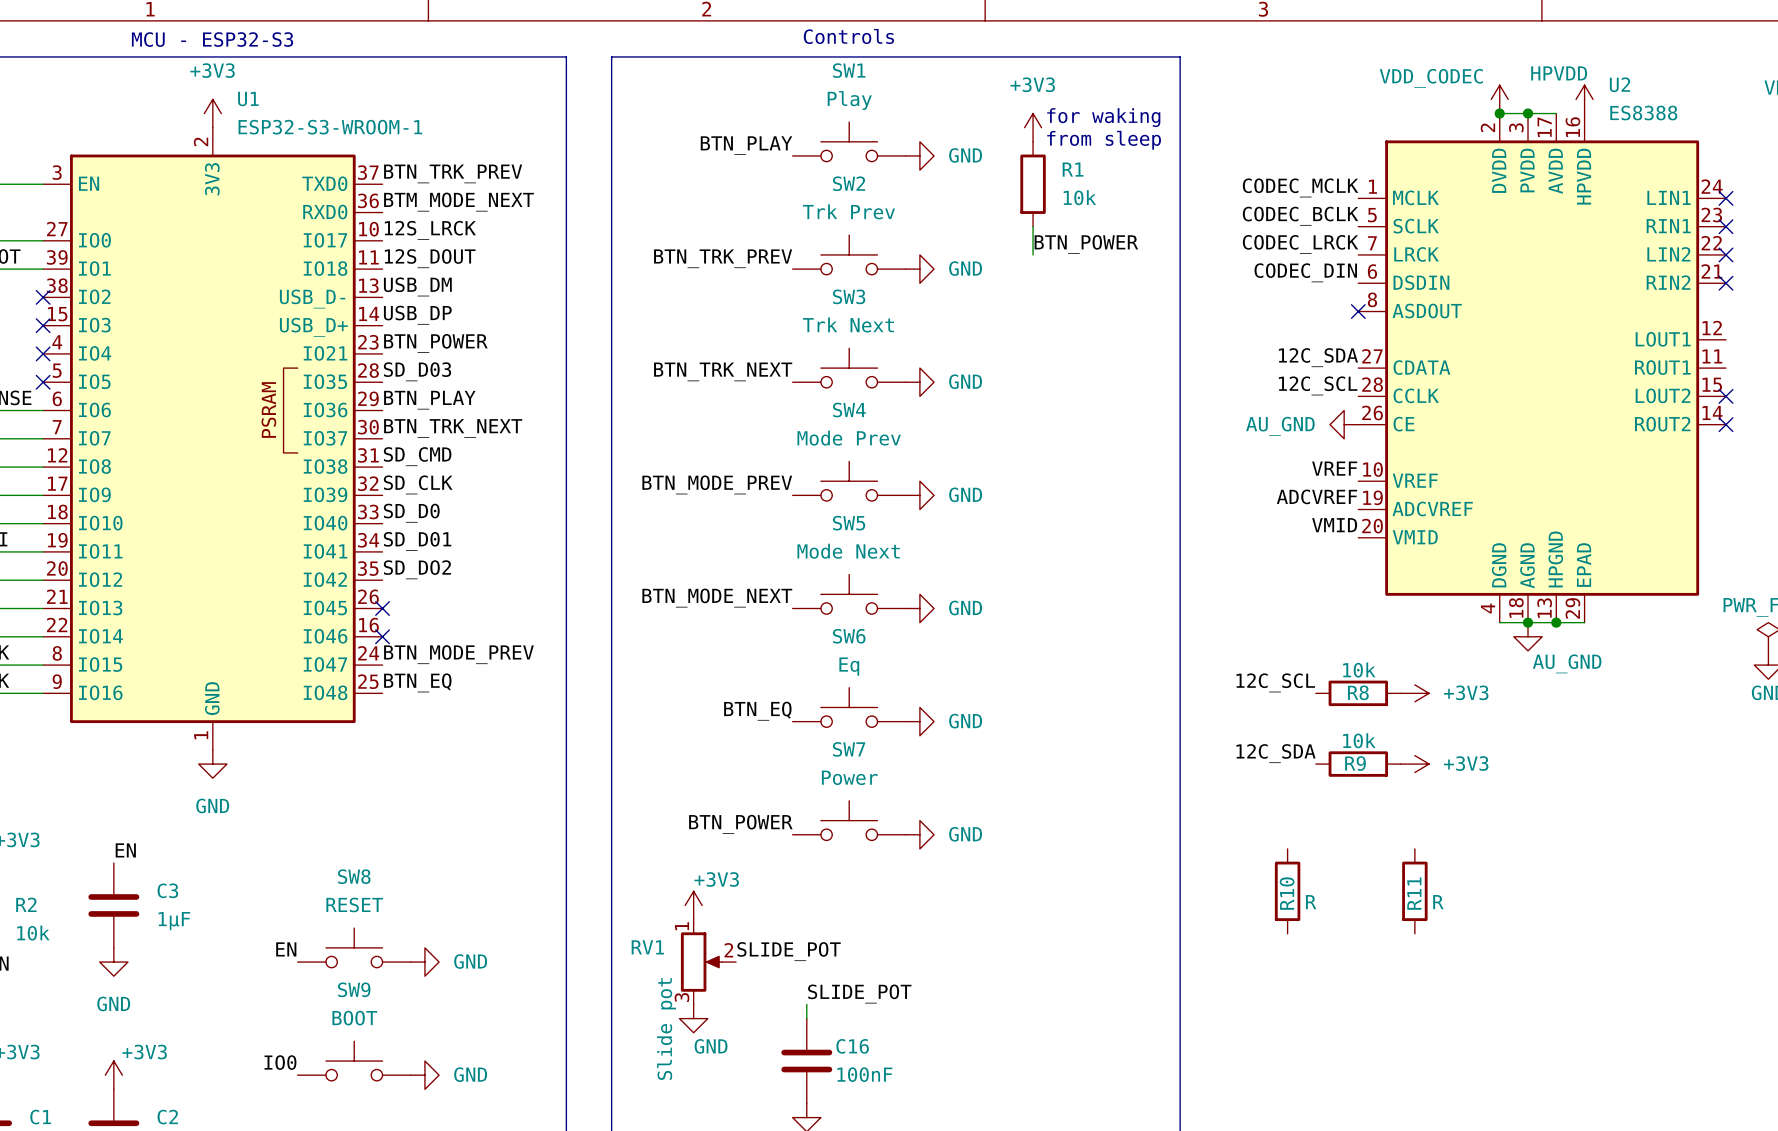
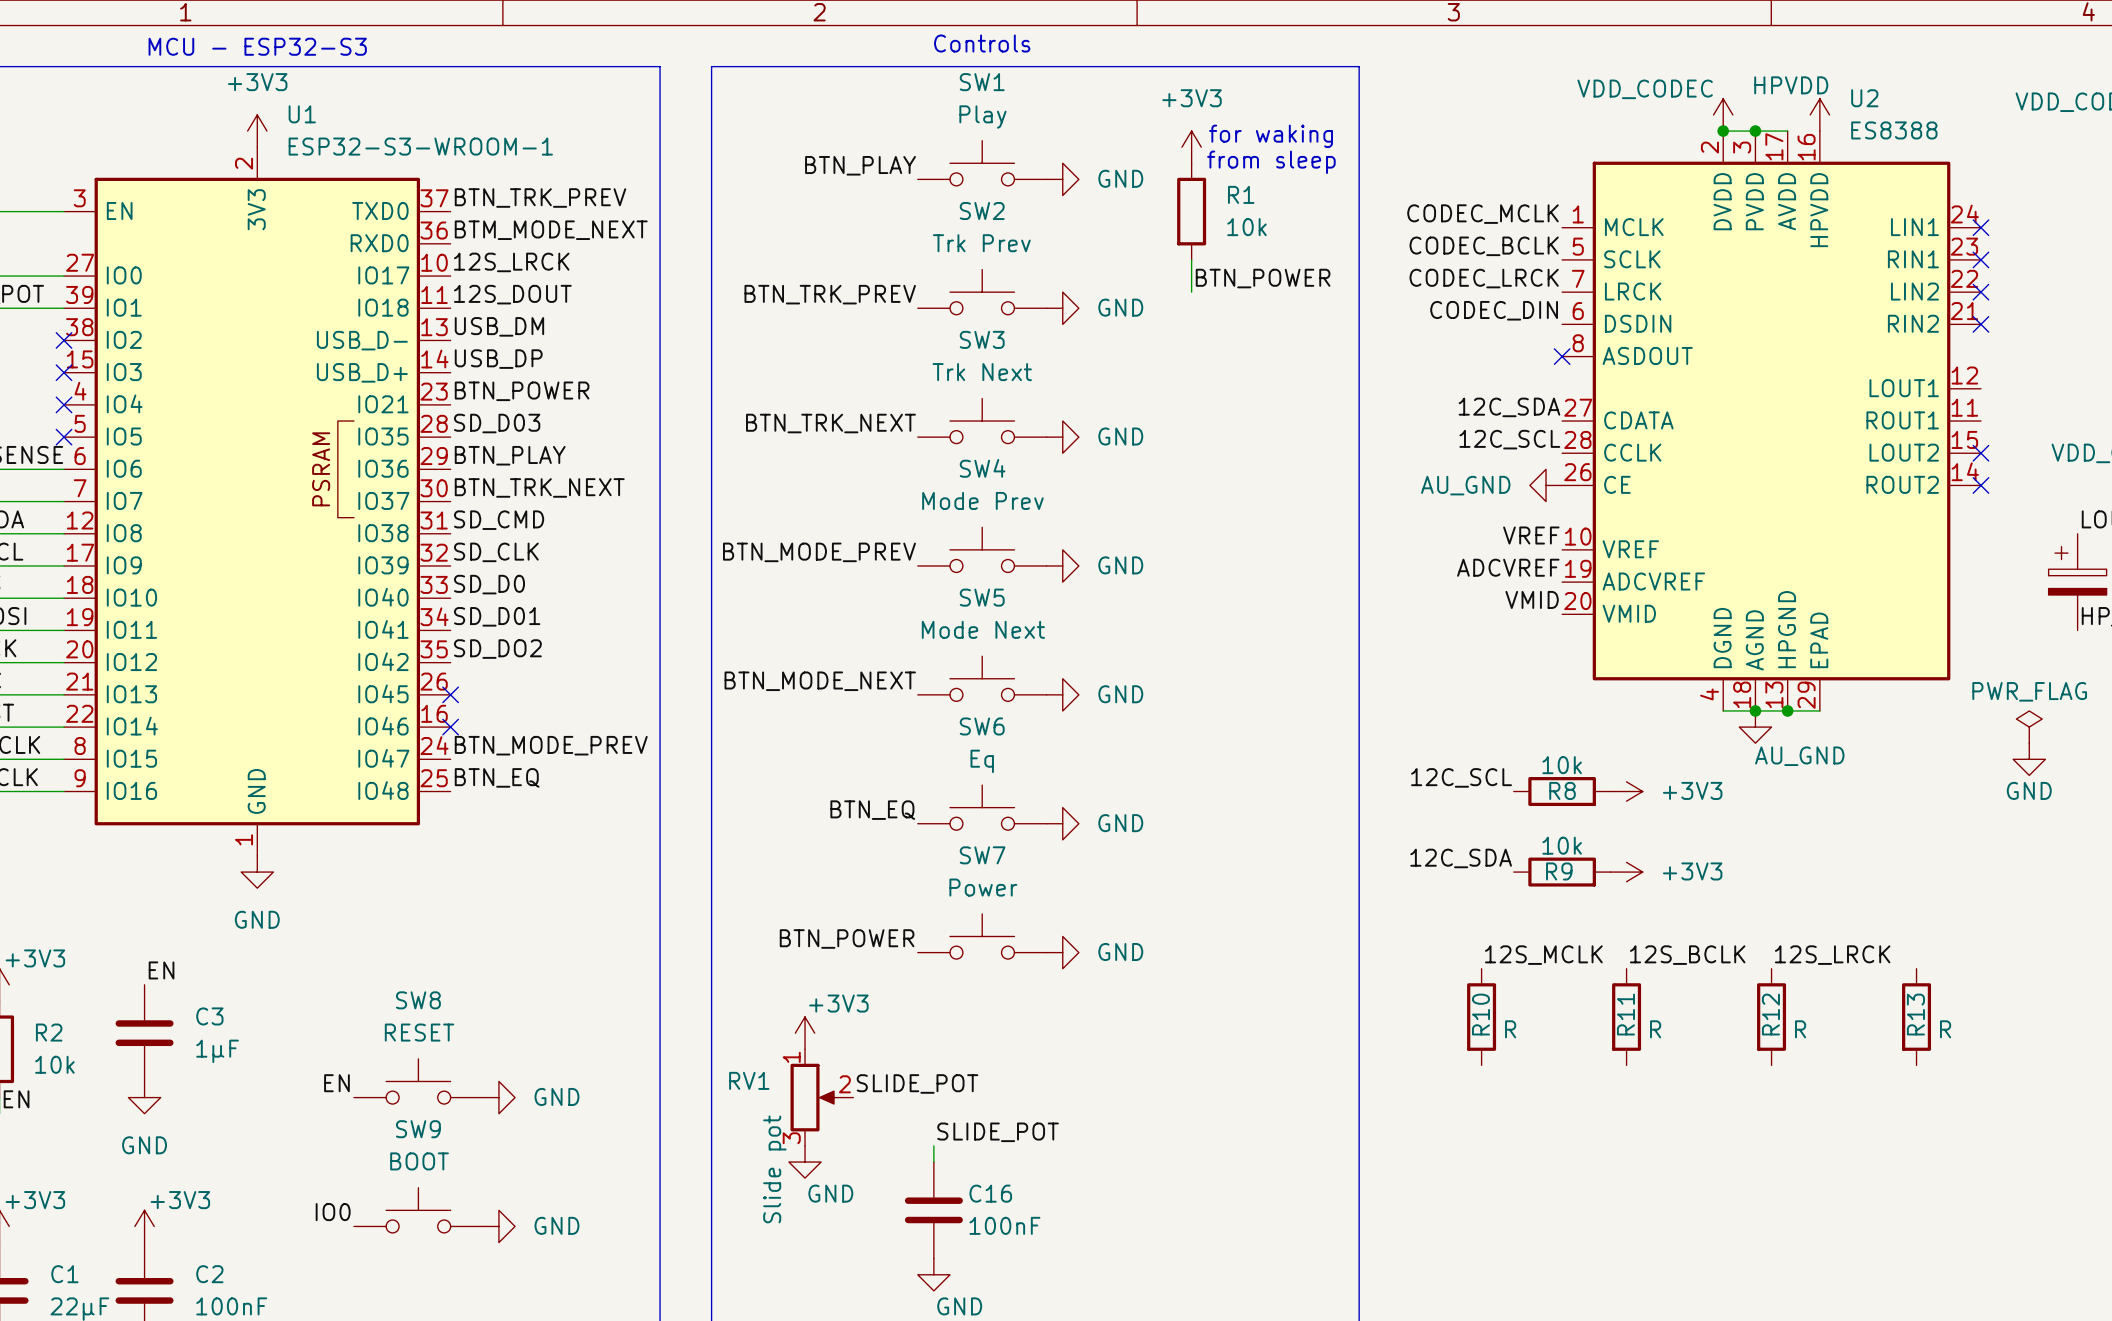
label: none -> 12S_MCLK (1543, 955)
label: none -> 12S_BCLK (1687, 955)
label: none -> 12S_LRCK (1832, 955)
R12: none -> R (1771, 1017)
R13: none -> R (1916, 1017)

